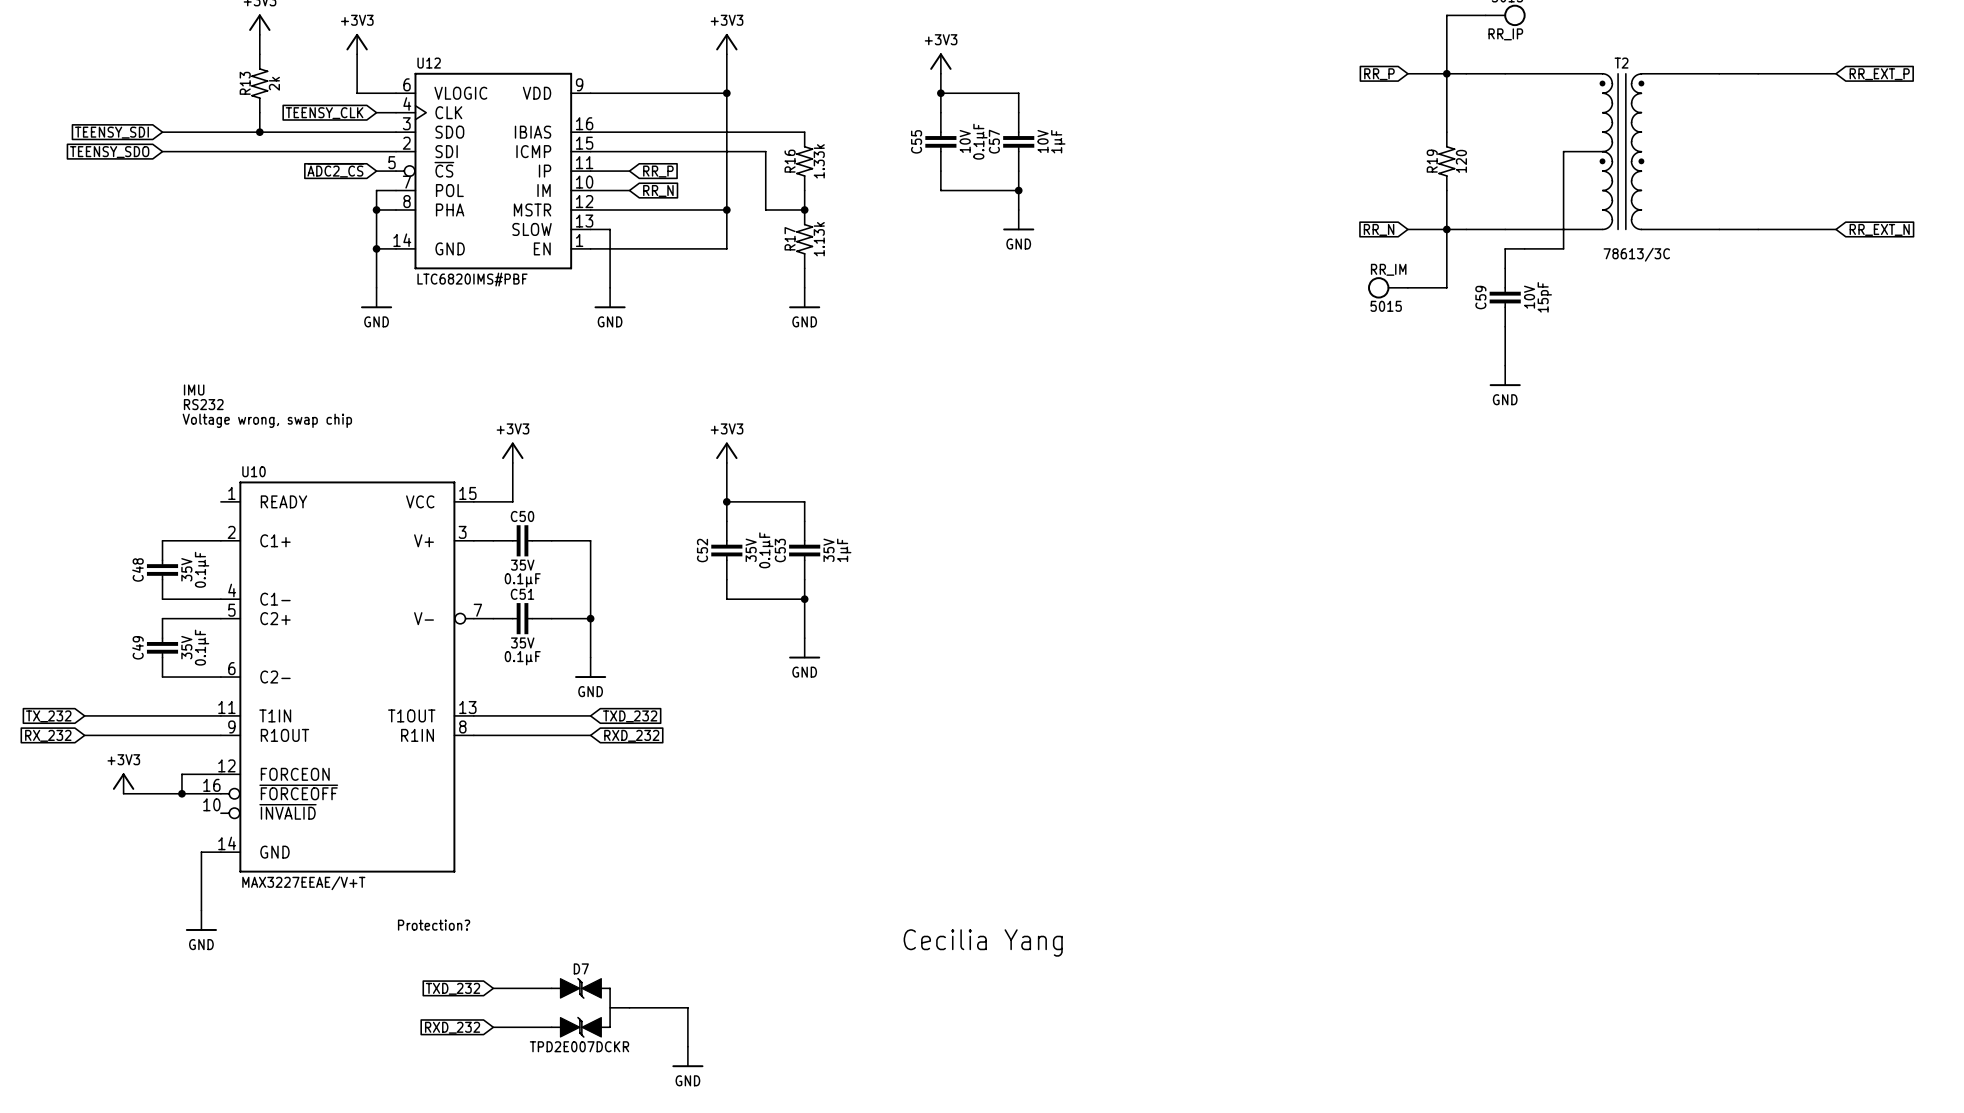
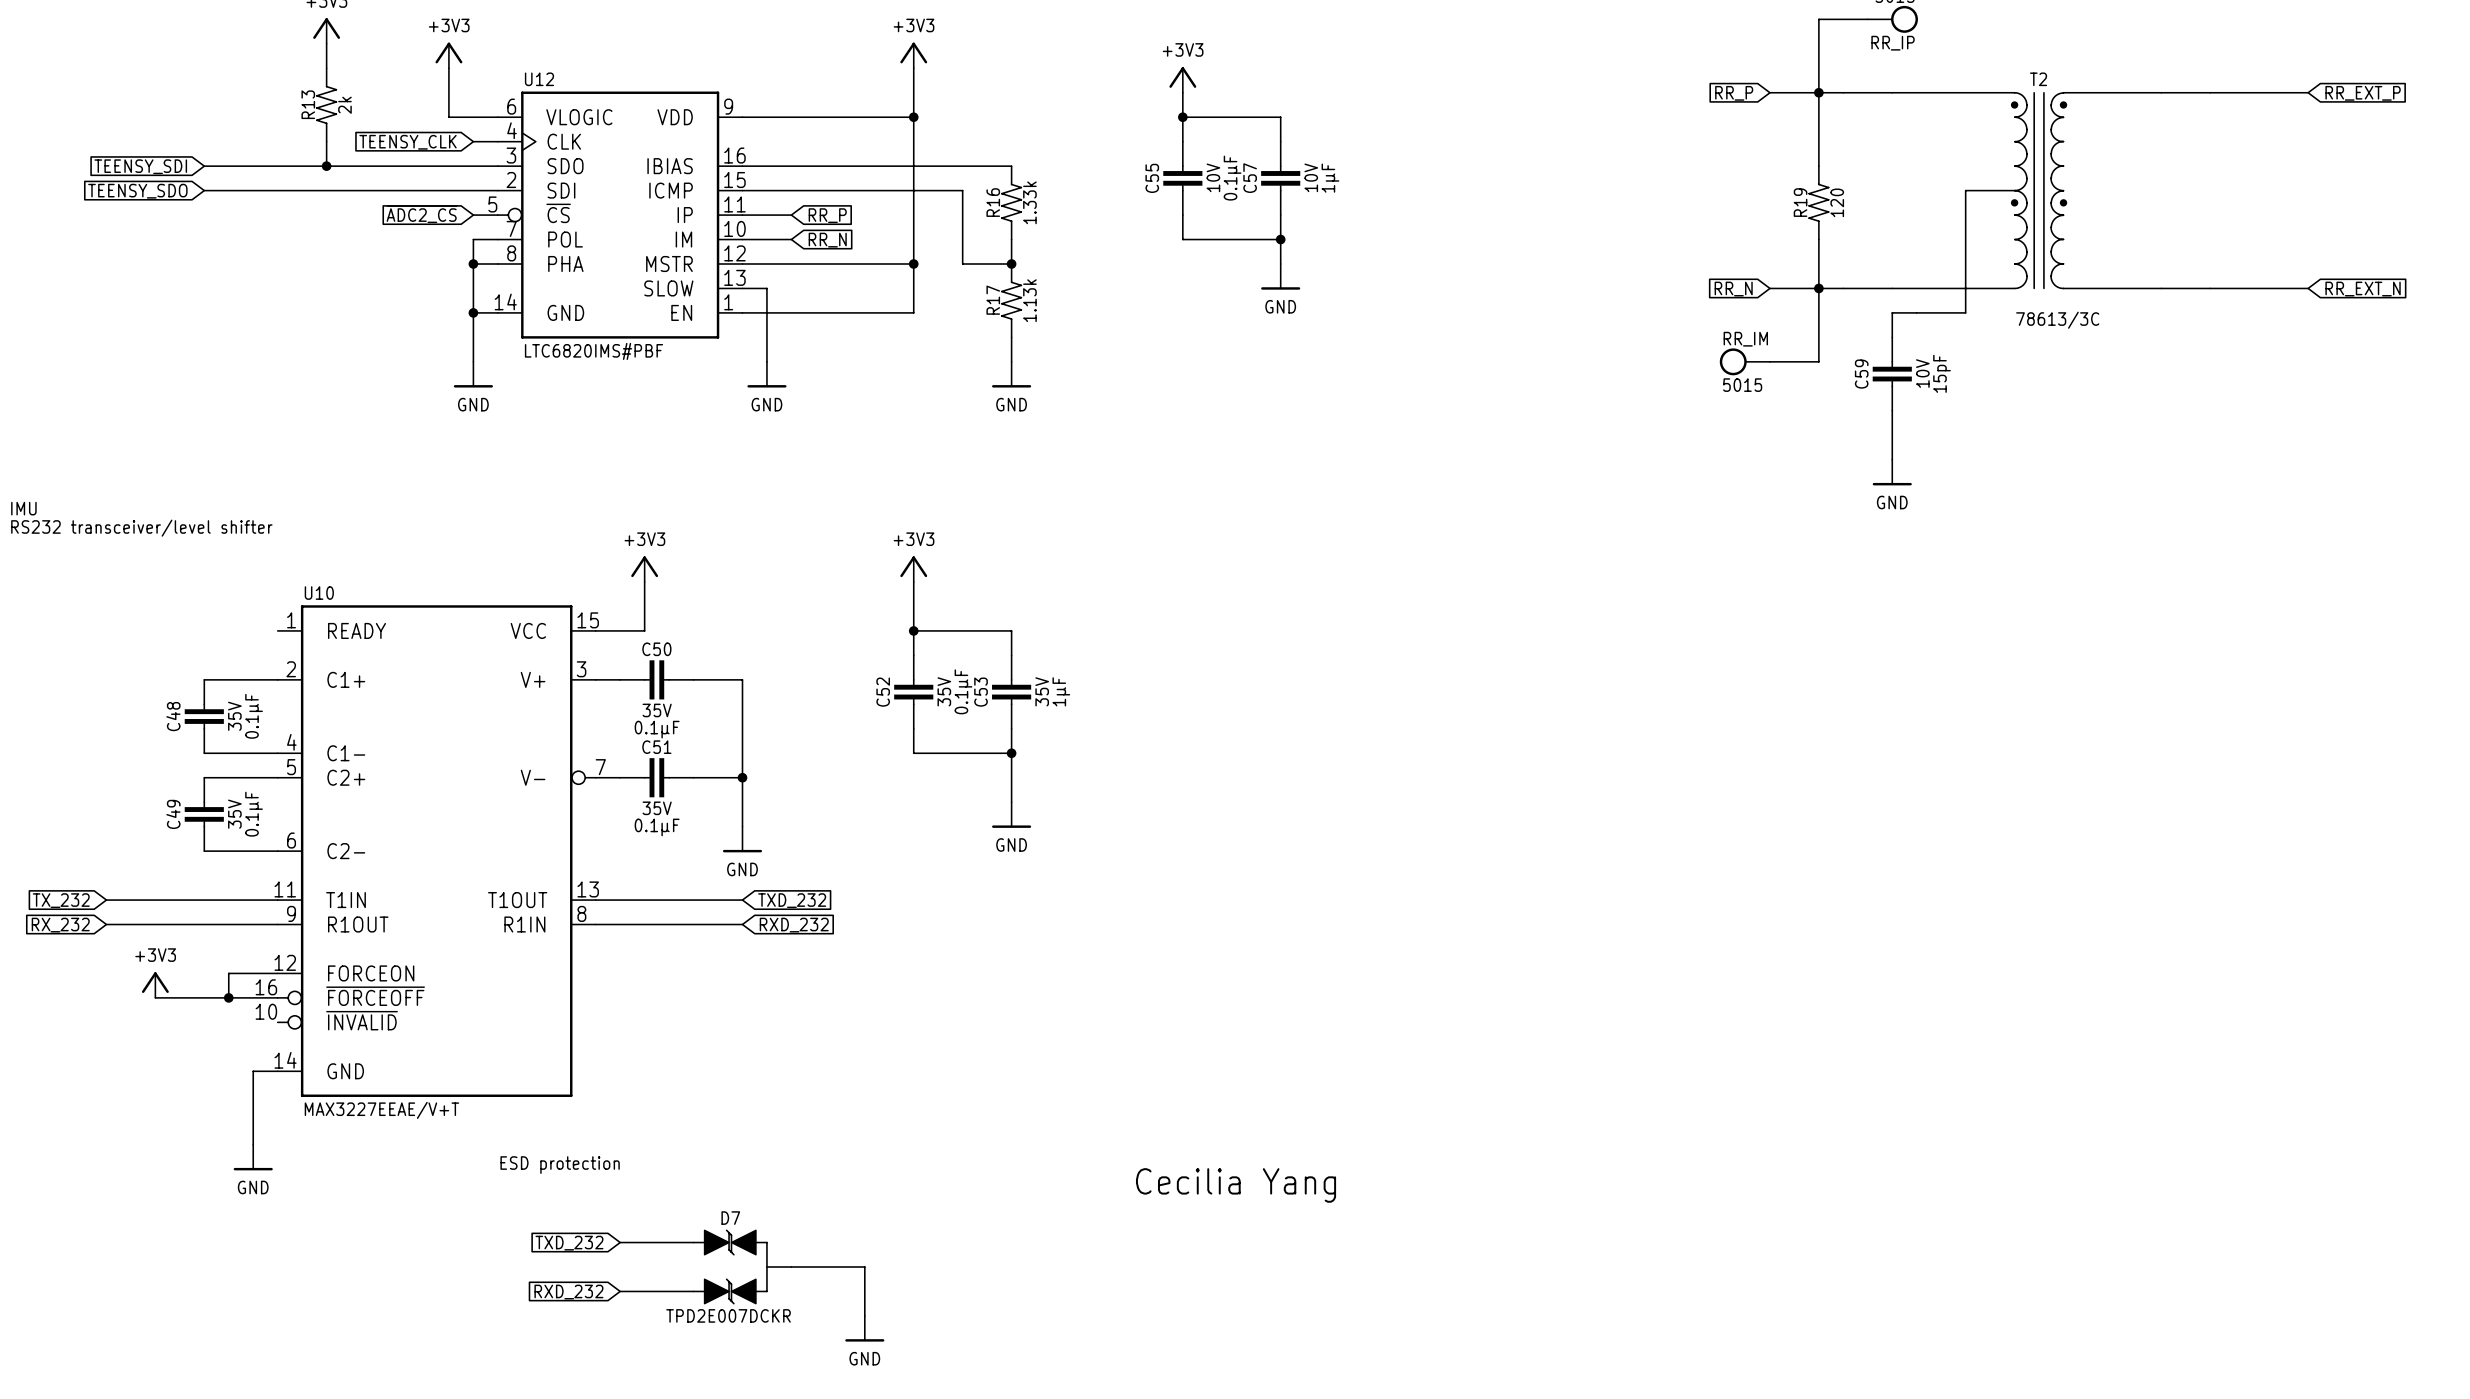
text position: IMU (194, 389) -> IMU (23, 508)
text: RS232 (203, 404) -> none
text: none -> RS232 transceiver/level shifter (141, 528)
text: Voltage wrong, swap chip (267, 420) -> none
text: Protection? (434, 925) -> ESD protection (560, 1165)

